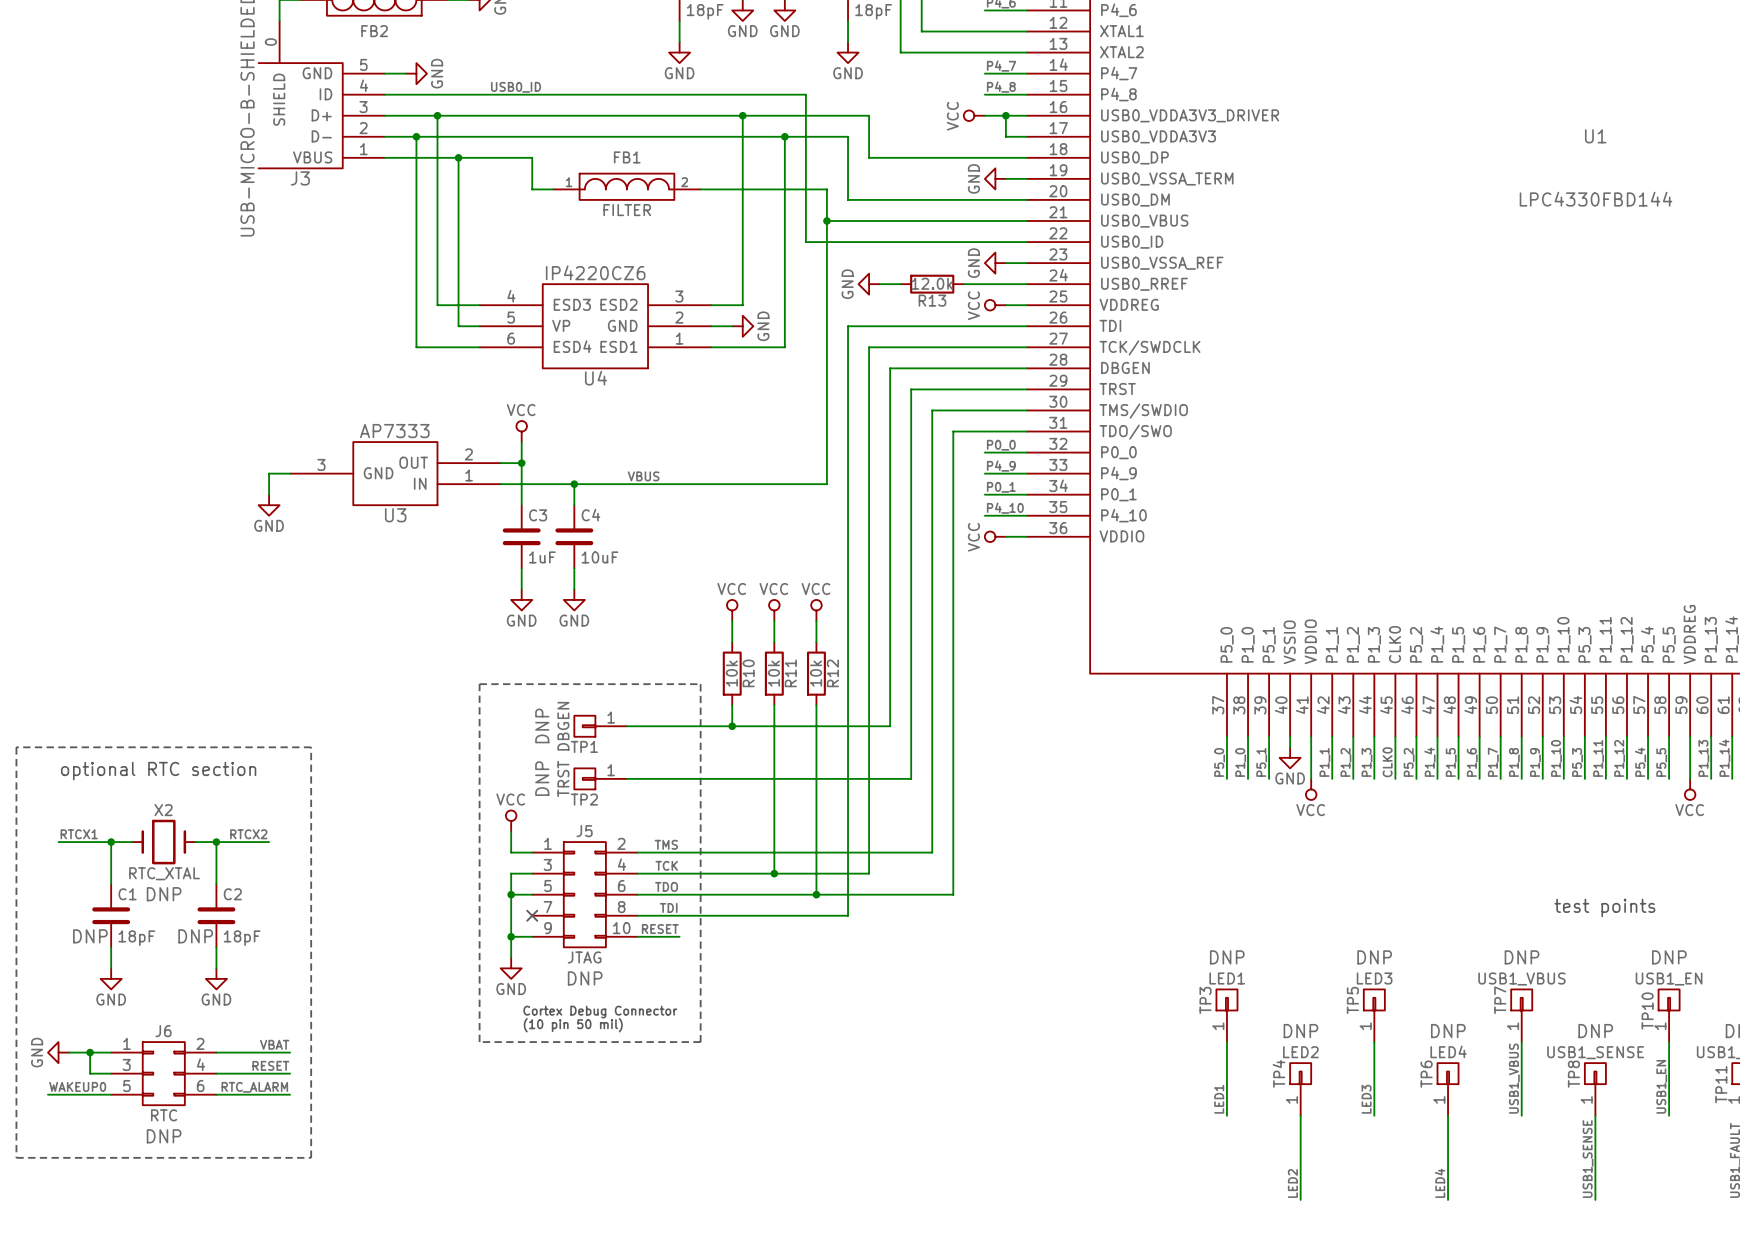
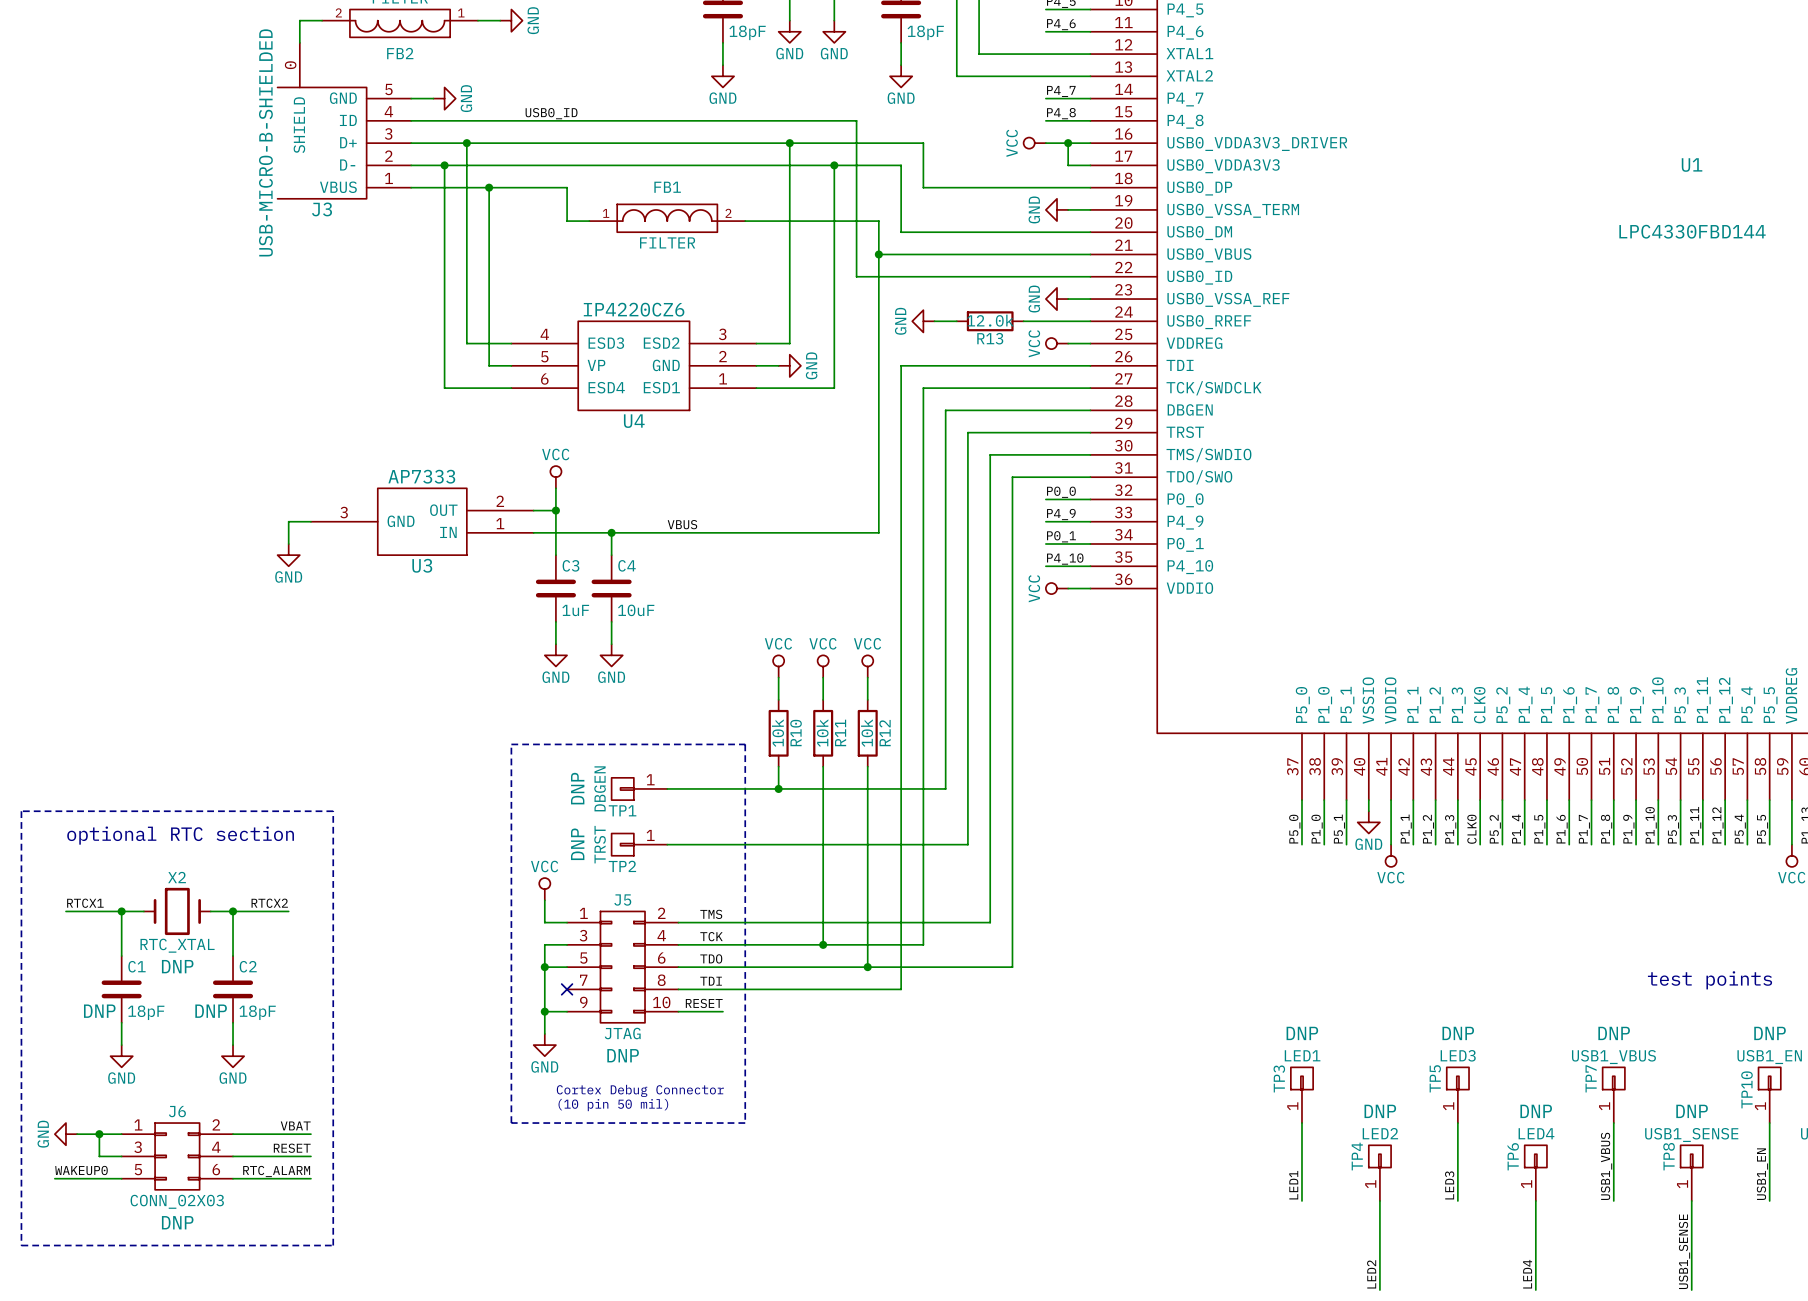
J6 value: RTC (164, 1115) -> CONN_02X03 (177, 1201)

